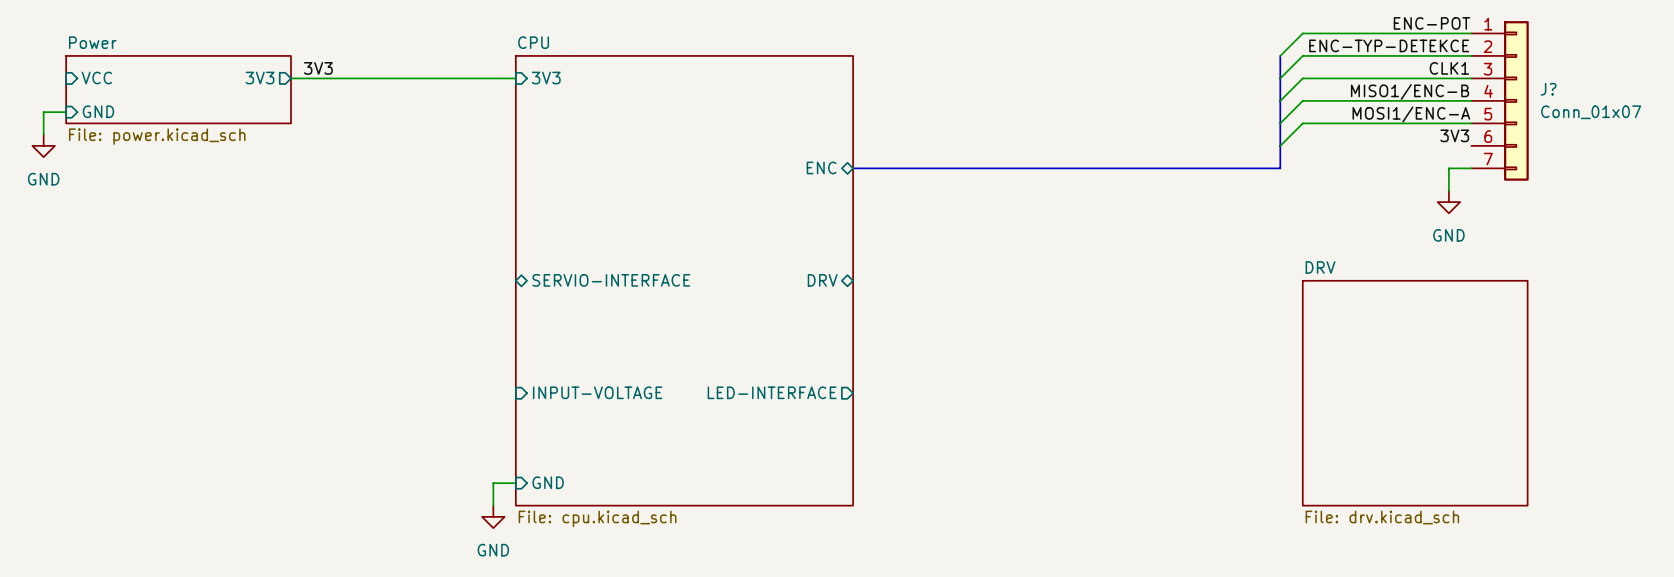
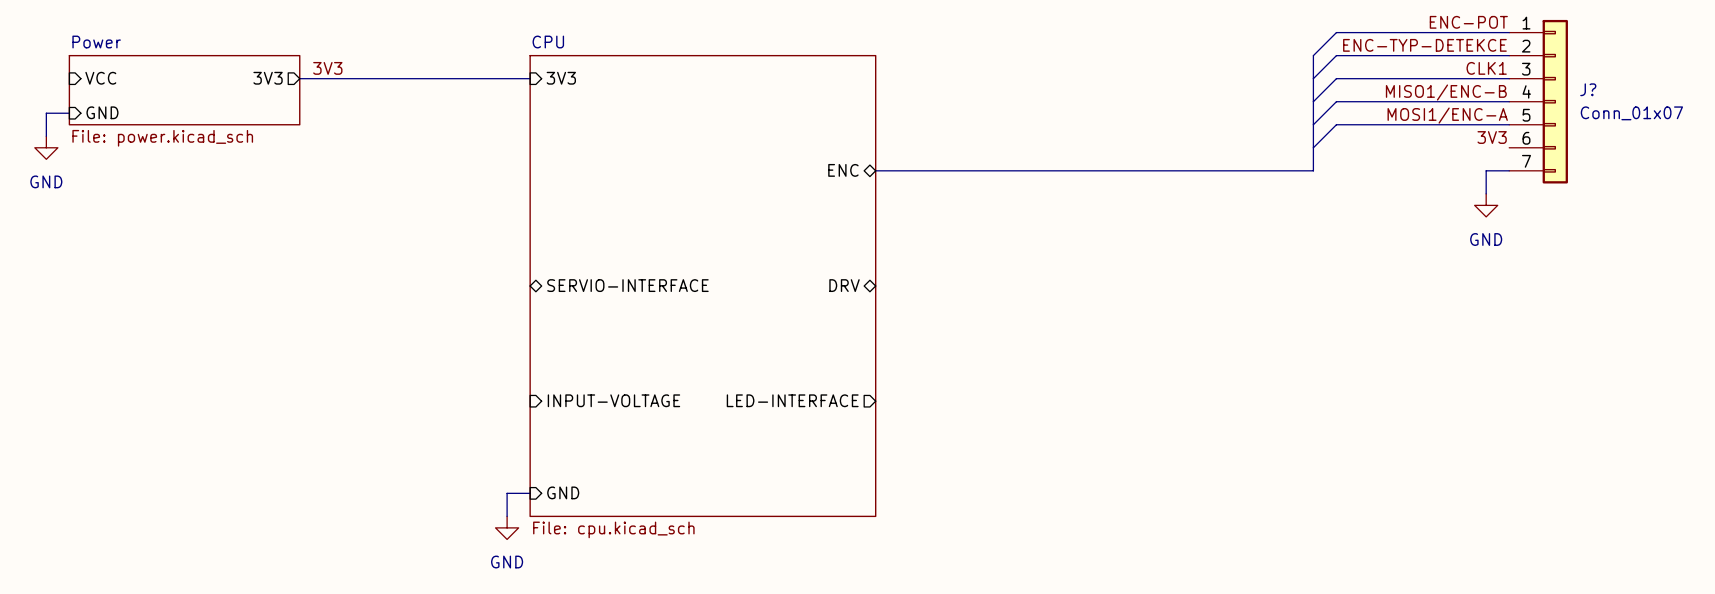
sheet DRV: File: drv.kicad_sch (1415, 393) -> none

